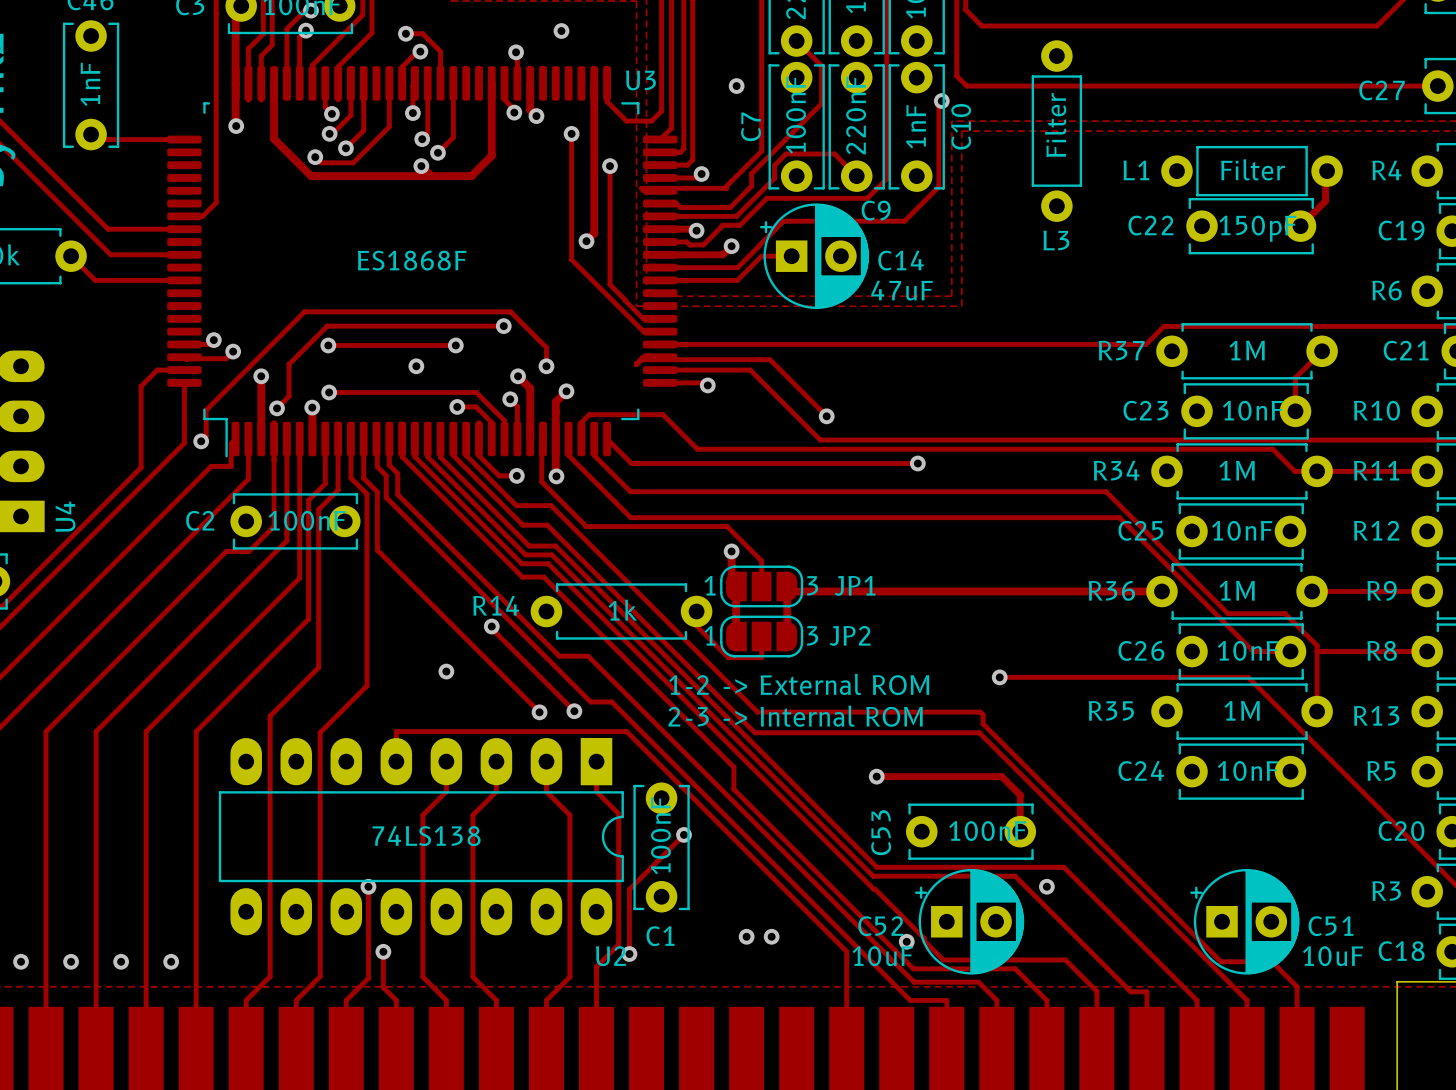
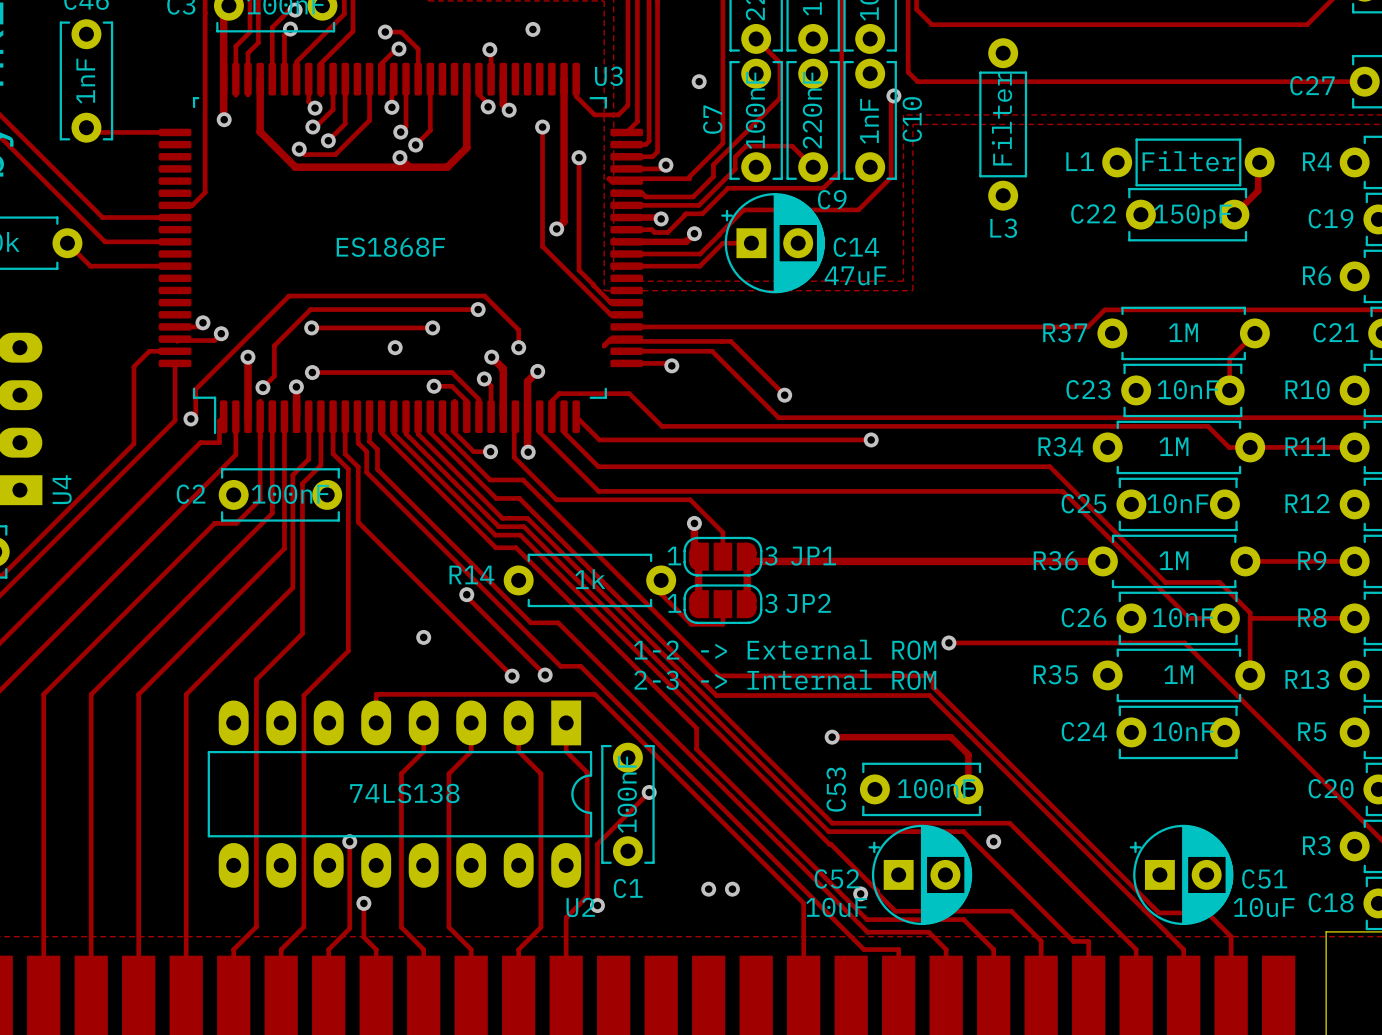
via: (21, 961) -> none
via: (71, 961) -> none
via: (121, 961) -> none
via: (171, 961) -> none

